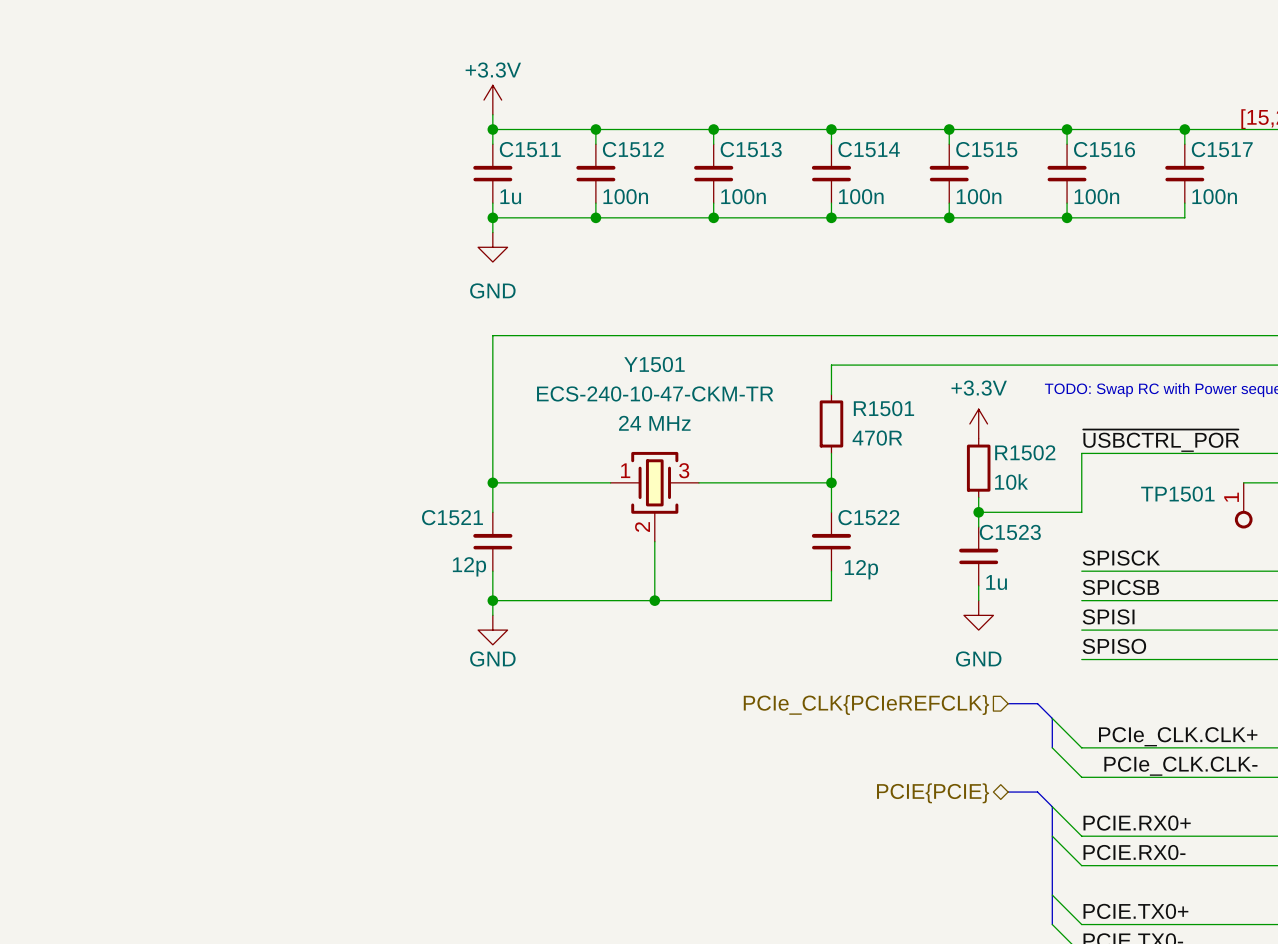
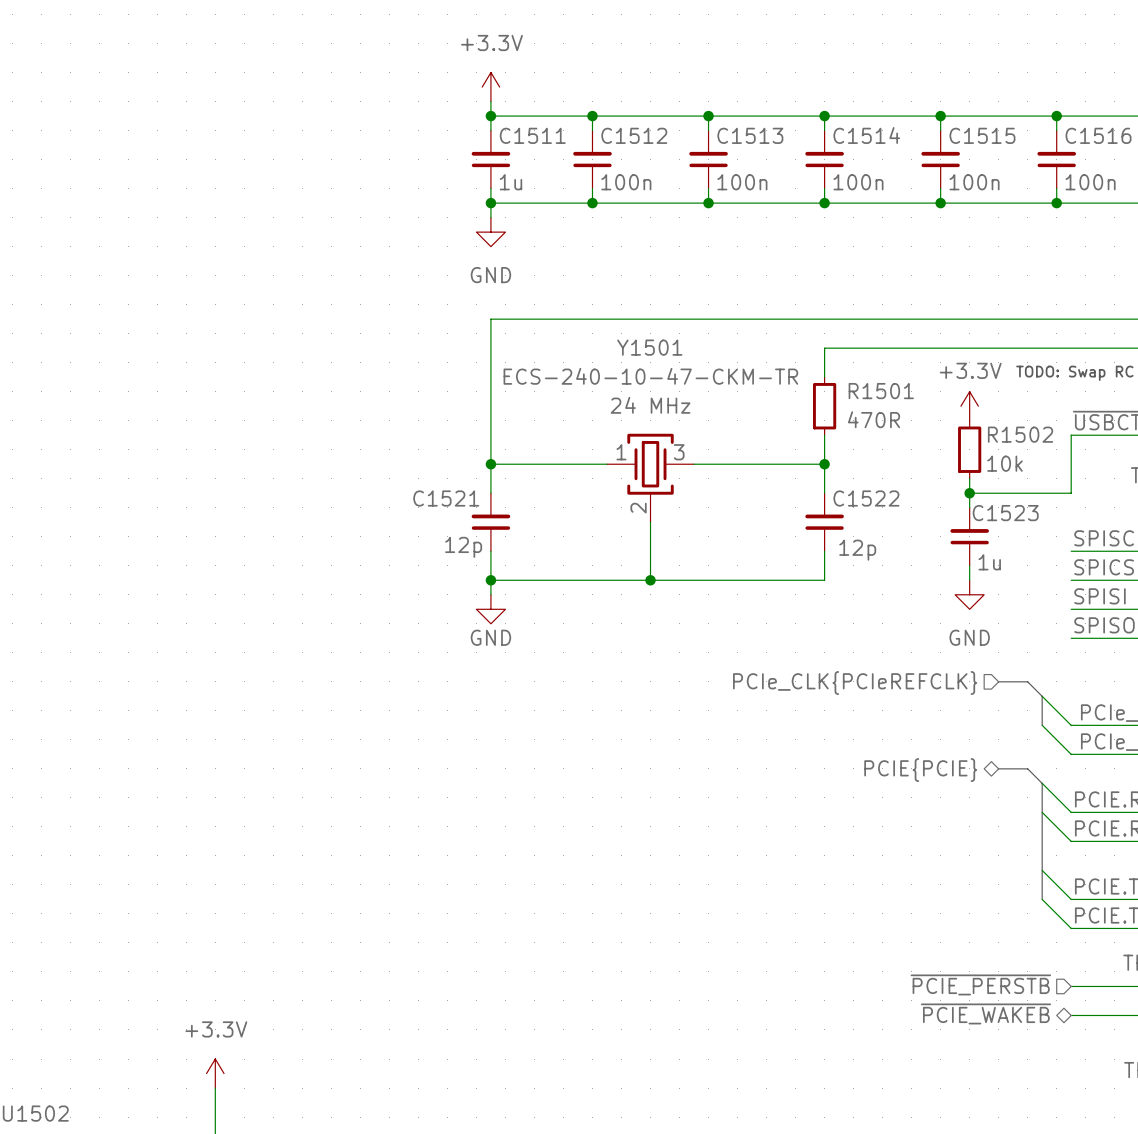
power symbol text position: +3.3V (493, 70) -> +3.3V (491, 42)

